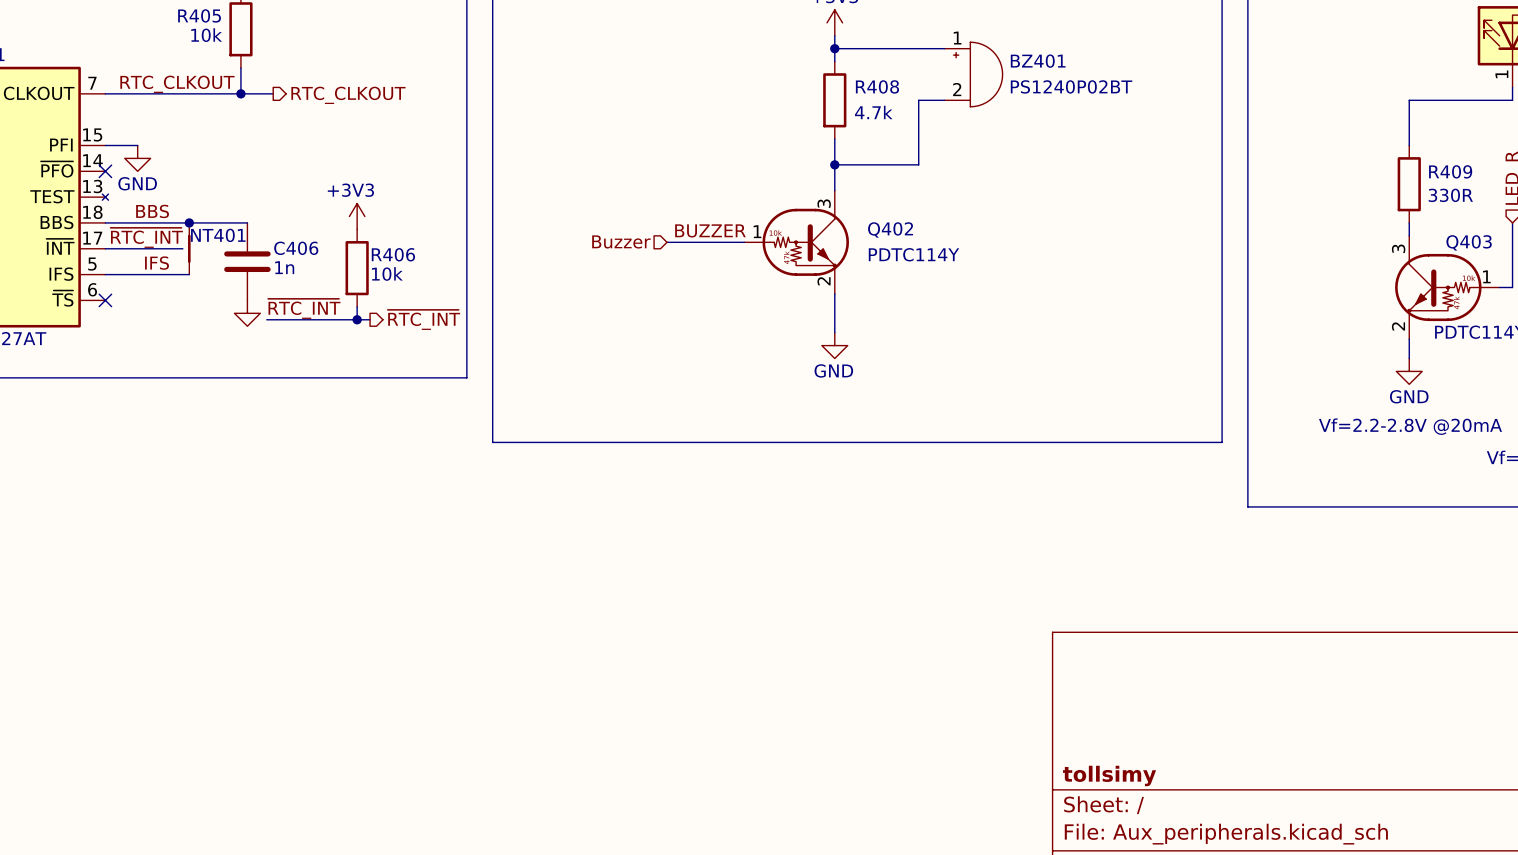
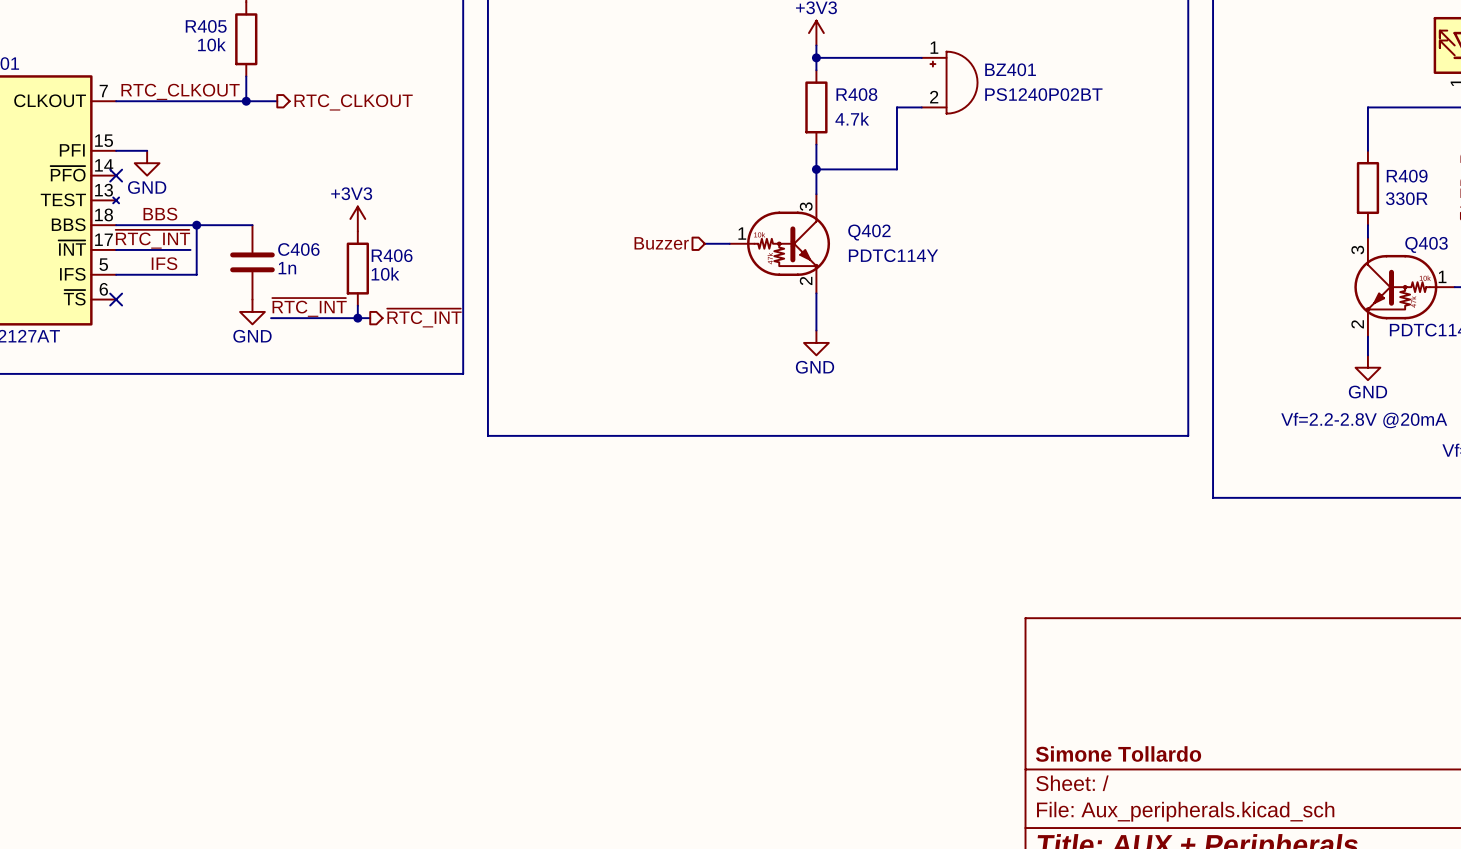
label: BUZZER (710, 230) -> none
hierarchical label position: Buzzer (621, 241) -> Buzzer (661, 243)
wire: (666, 242) (718, 242) -> none
NT401: (189, 248) -> none
power symbol text: none -> GND (252, 336)
title block: tollsimy (1109, 775) -> Simone Tollardo (1118, 753)

